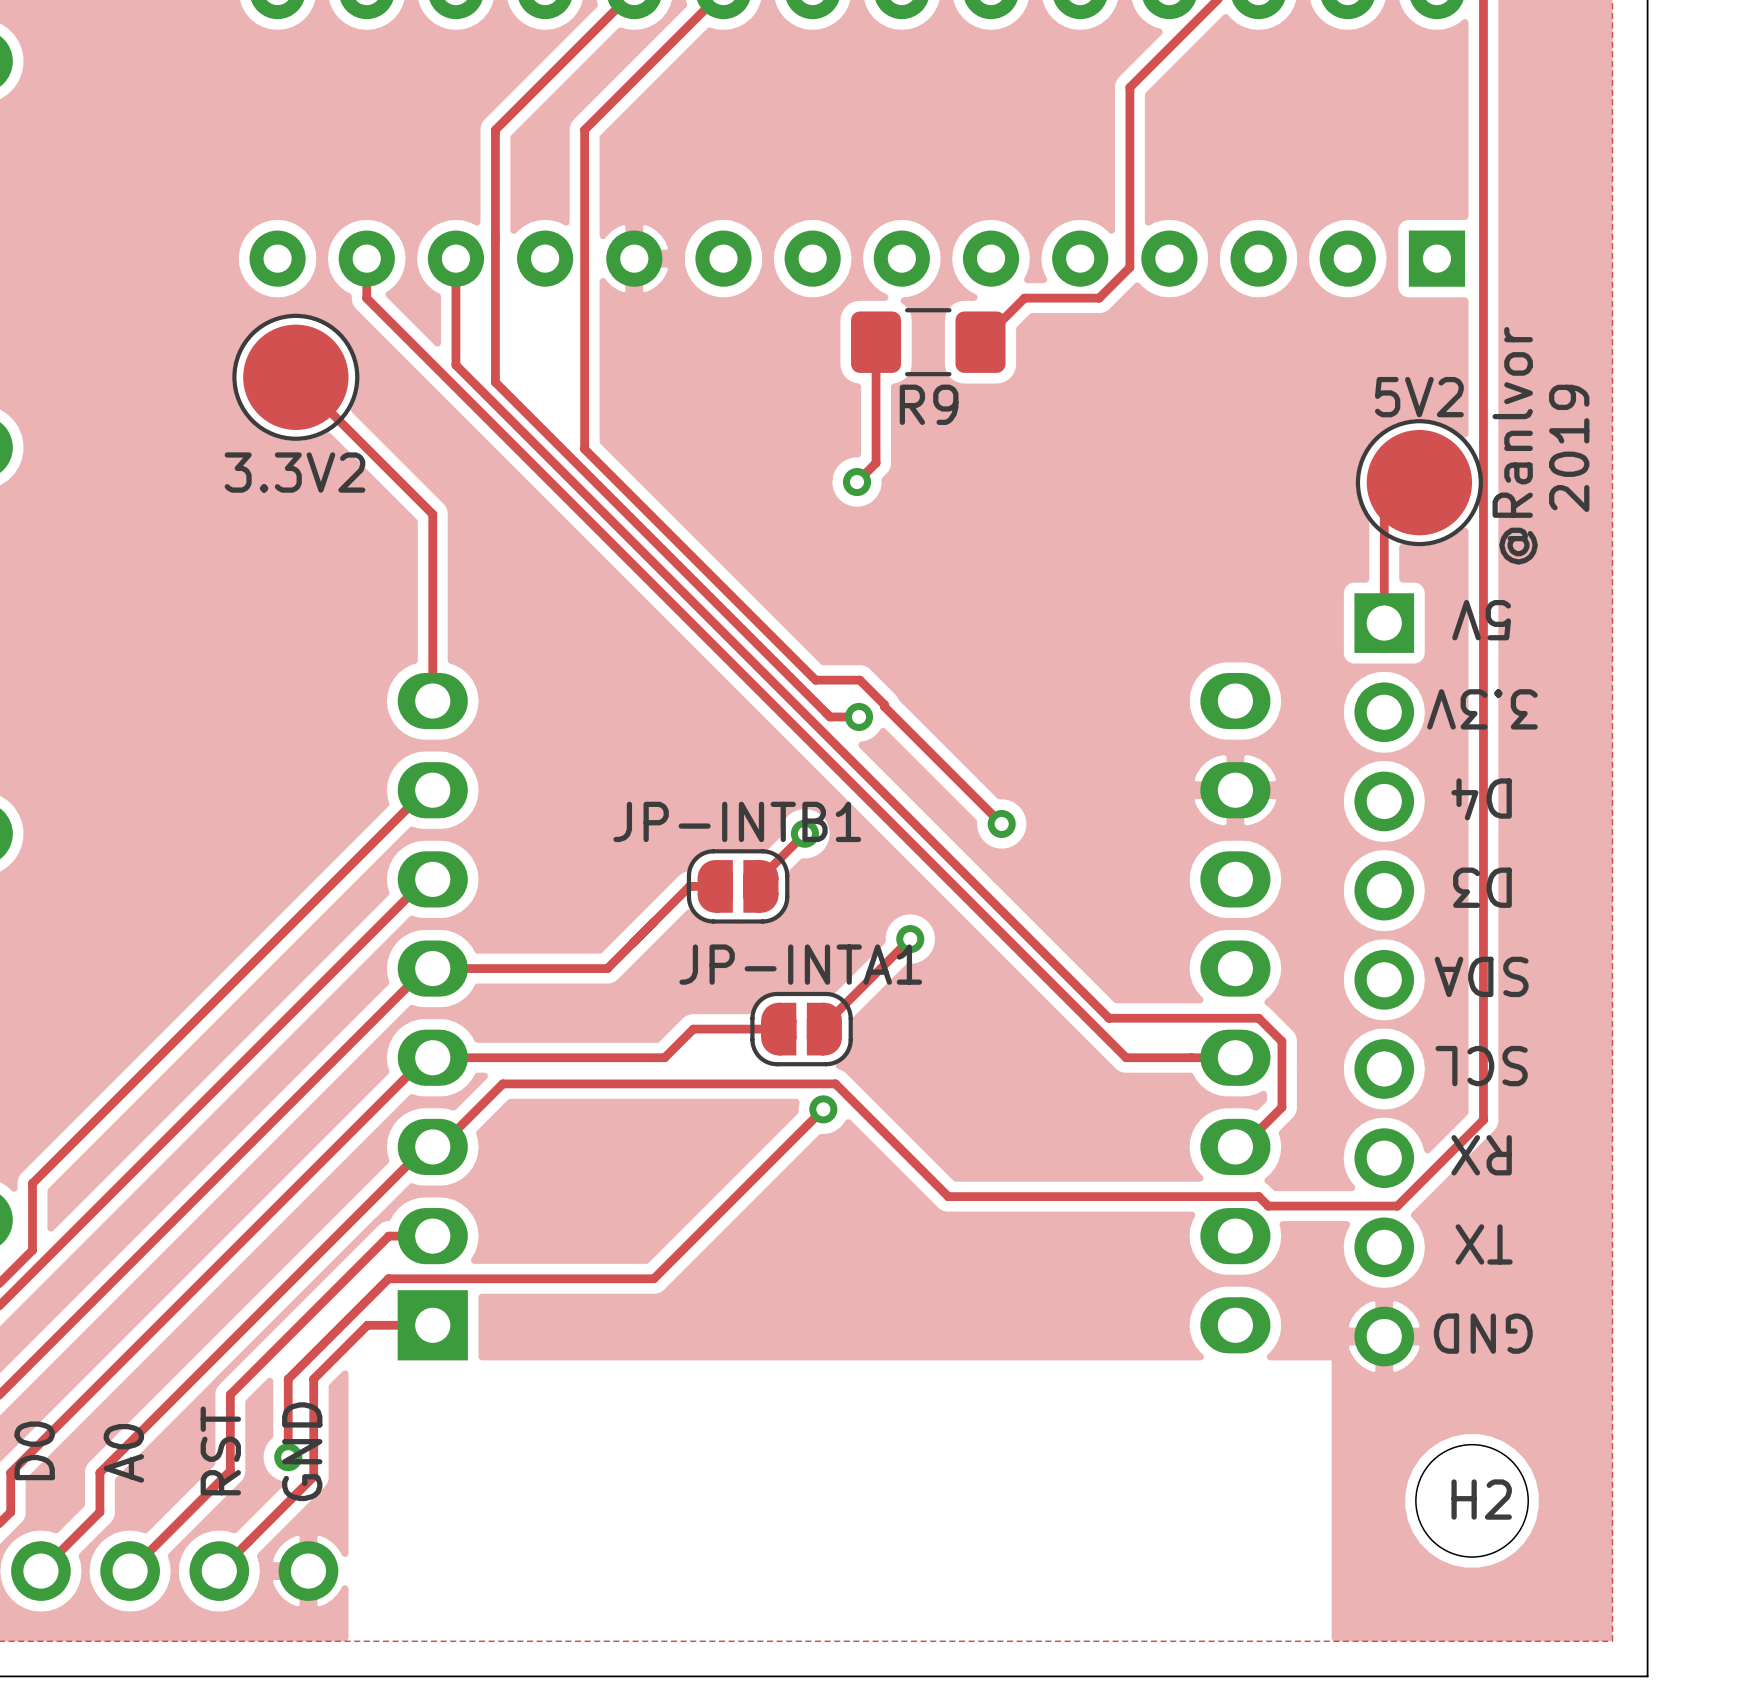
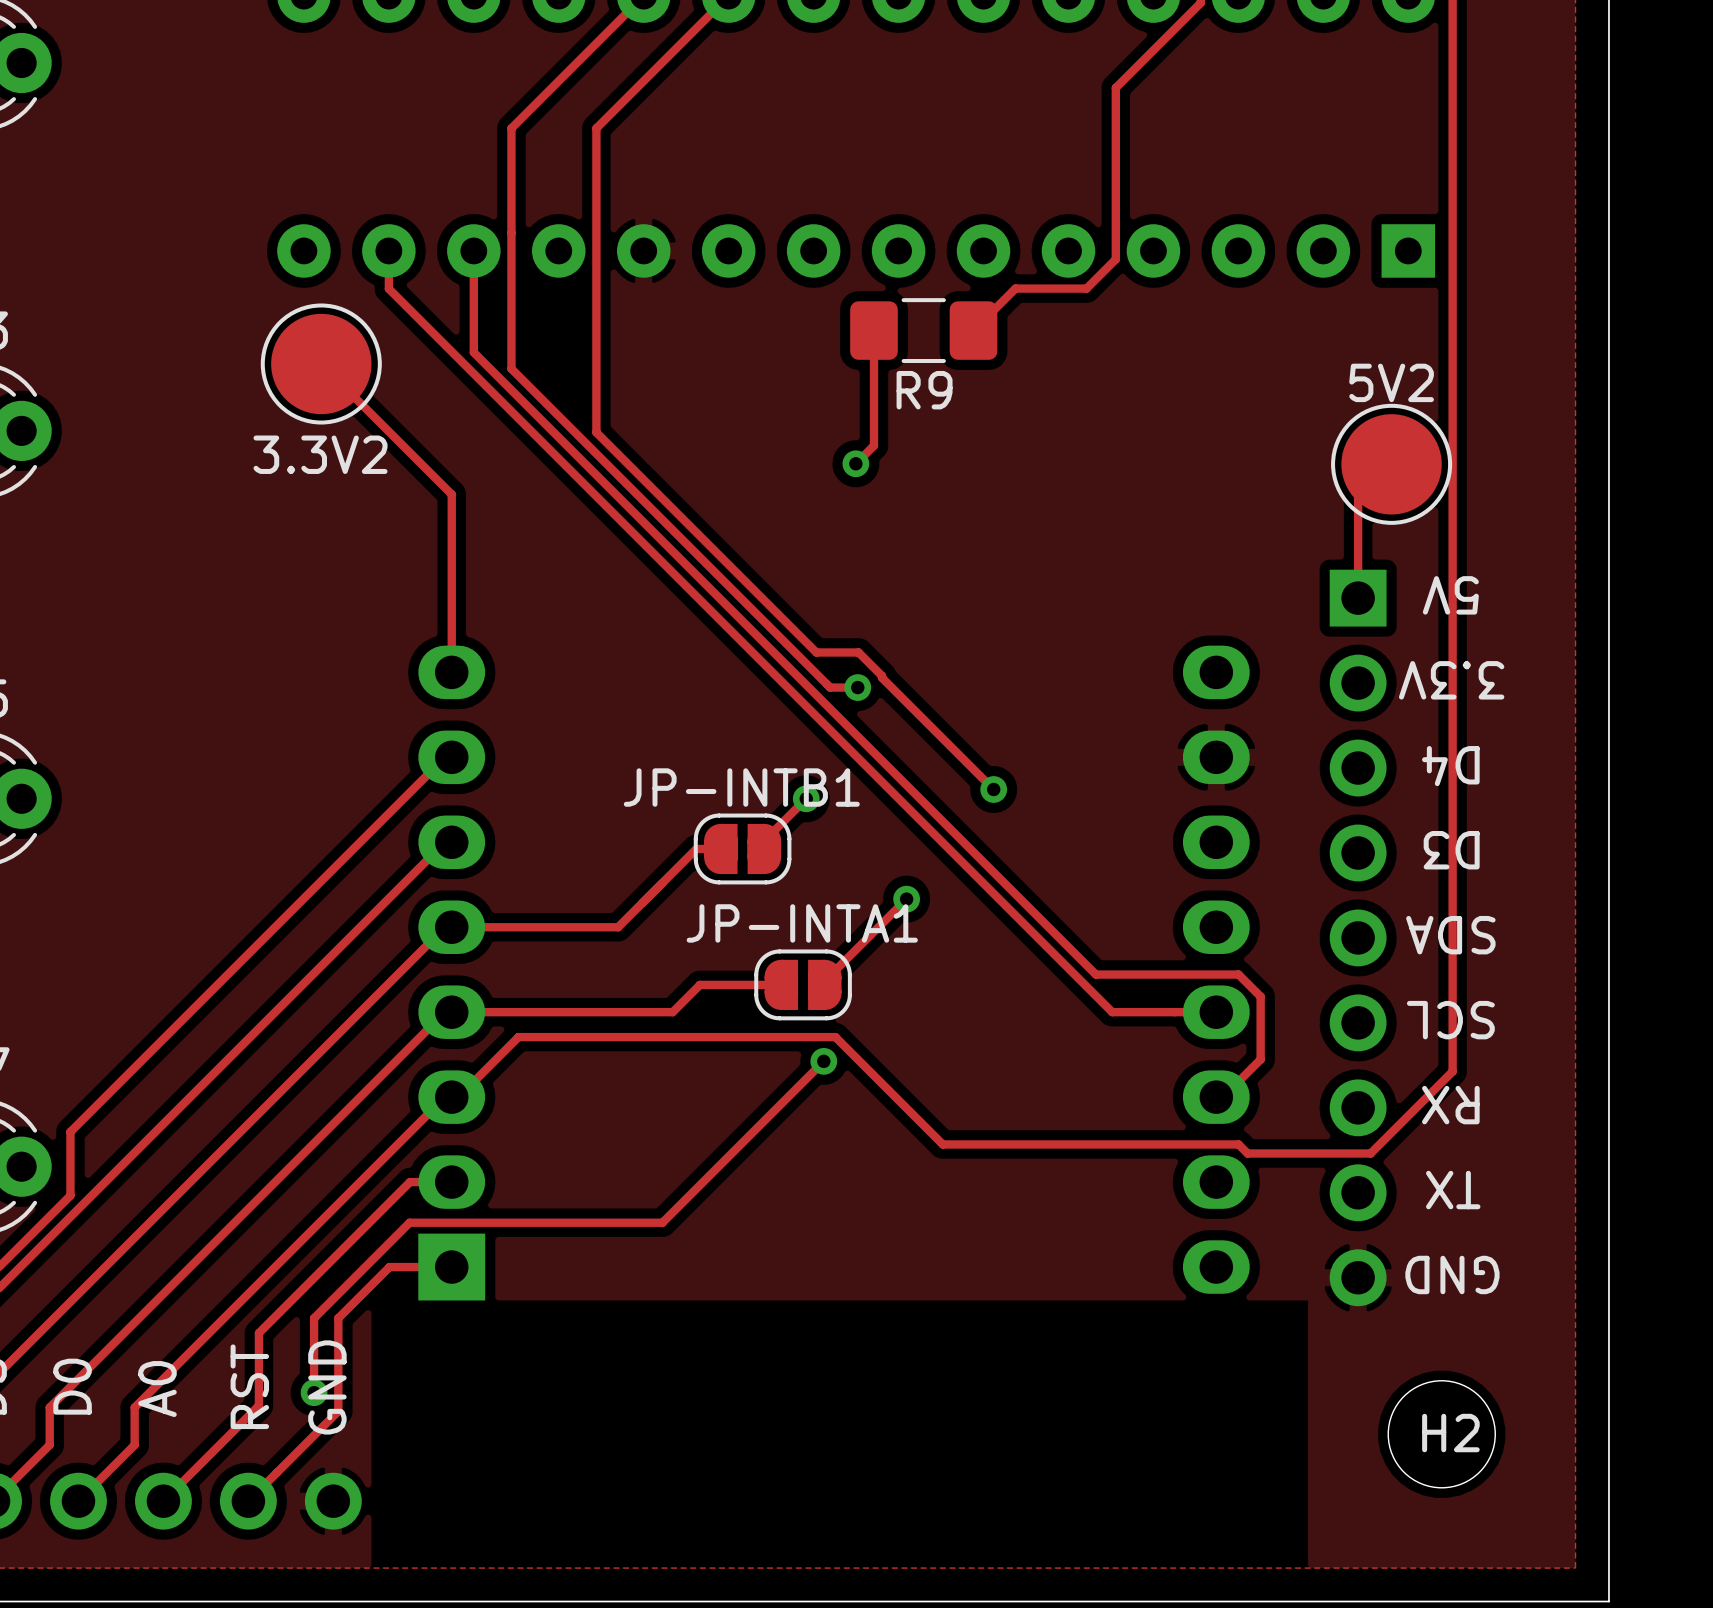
text: @Ranlvor (1515, 445) -> none
text: 2019 (1569, 448) -> none

